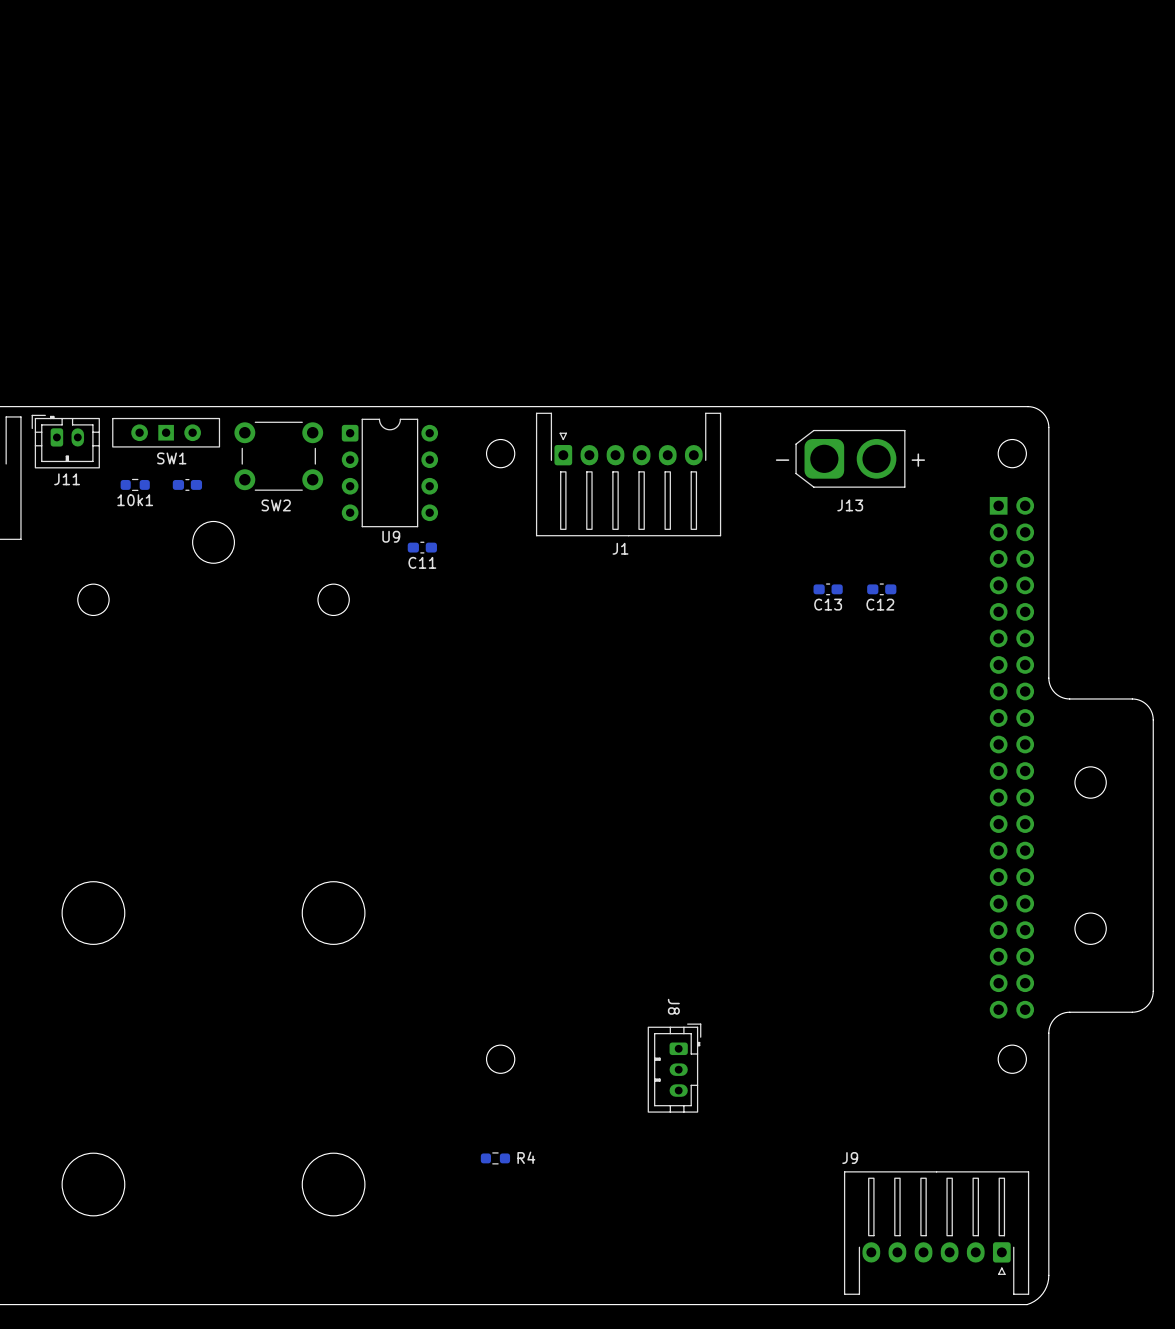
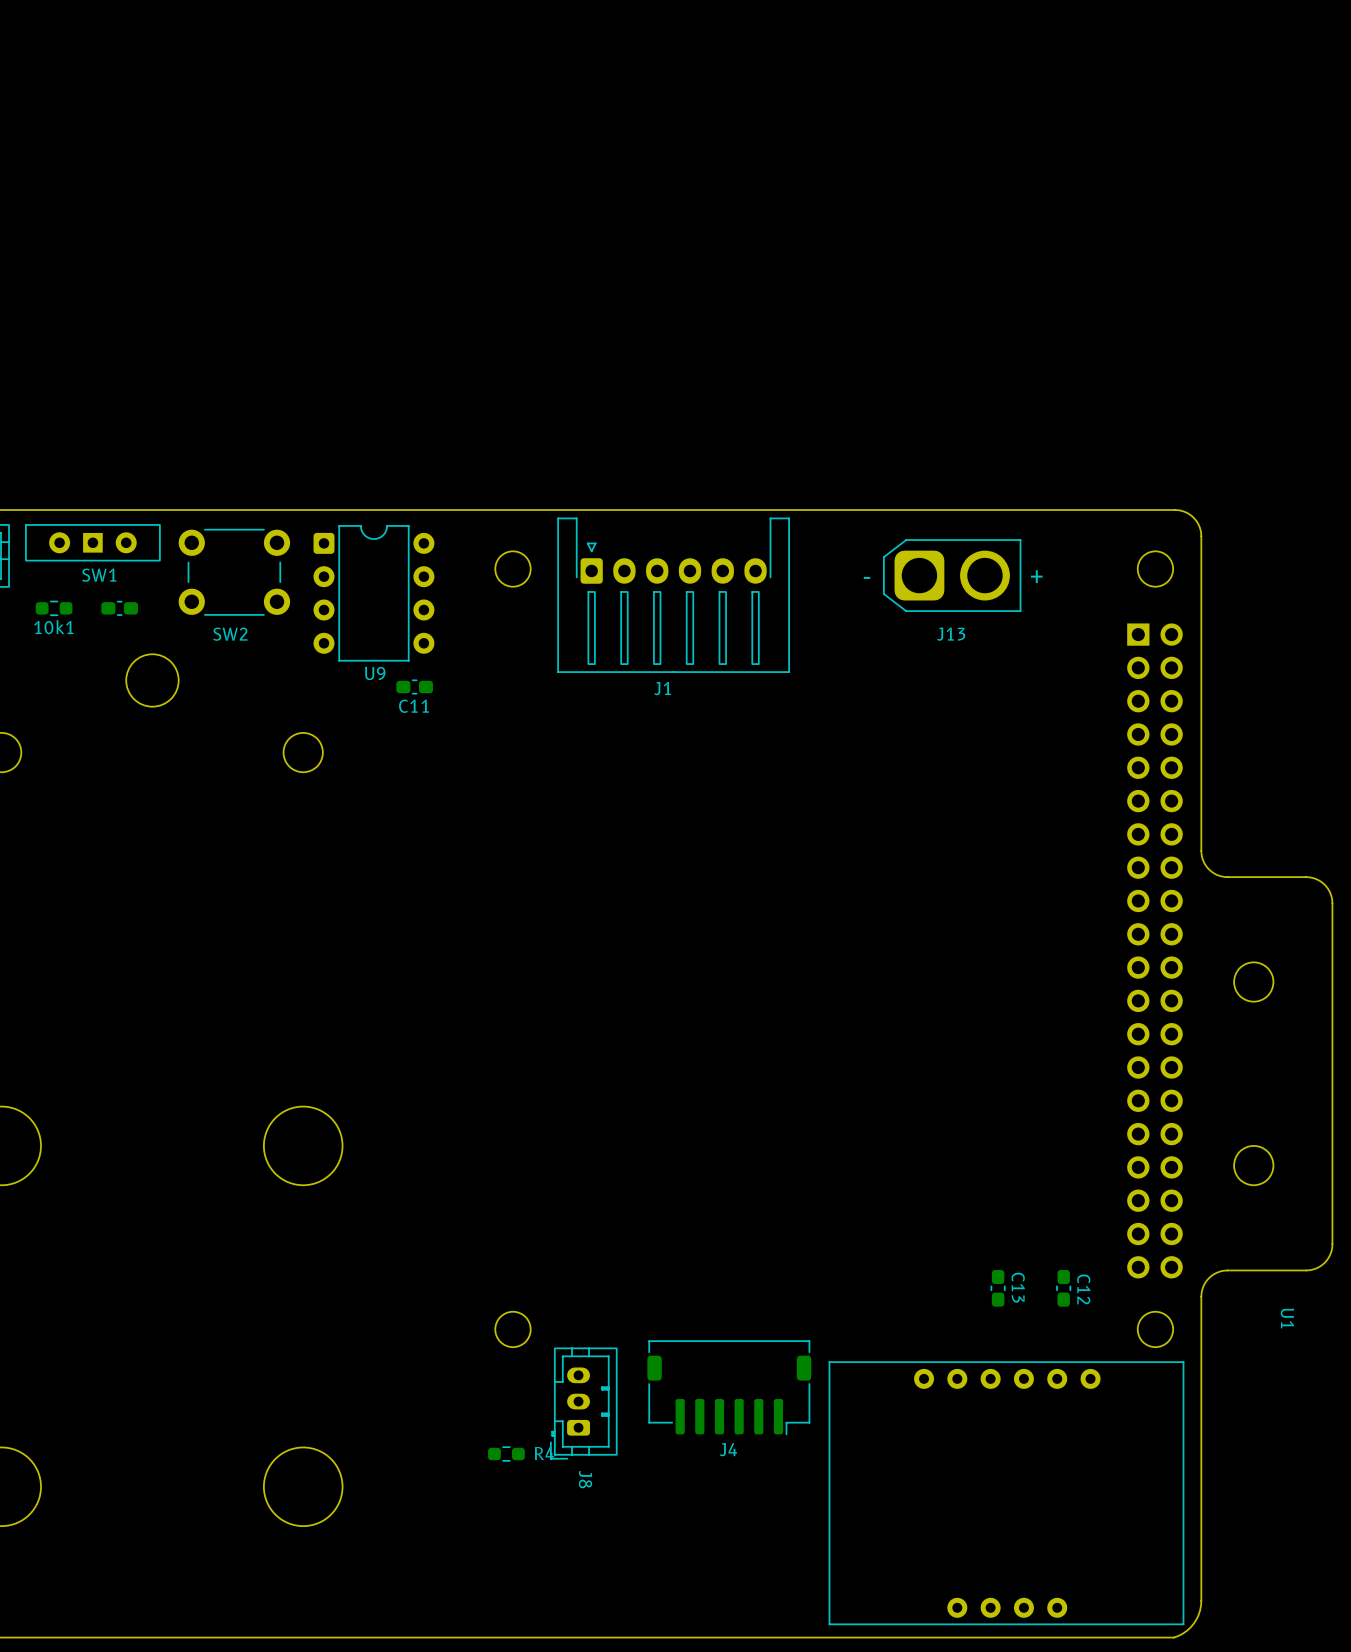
C13 rotation: 0° (828, 589) -> 90° clockwise (998, 1288)
C13 position: (828, 589) -> (998, 1288)
C12 rotation: 0° (881, 589) -> 90° clockwise (1063, 1288)
C12 position: (881, 589) -> (1063, 1288)
C13 name position: C13 (828, 604) -> C13 (1018, 1287)
C12 name position: C12 (880, 604) -> C12 (1083, 1289)
J8 rotation: 0° (674, 1068) -> 180° (583, 1403)
J8 position: (674, 1068) -> (583, 1403)
J4: none -> (729, 1387)
U1: none -> (1006, 1493)
J9: (936, 1233) -> none

